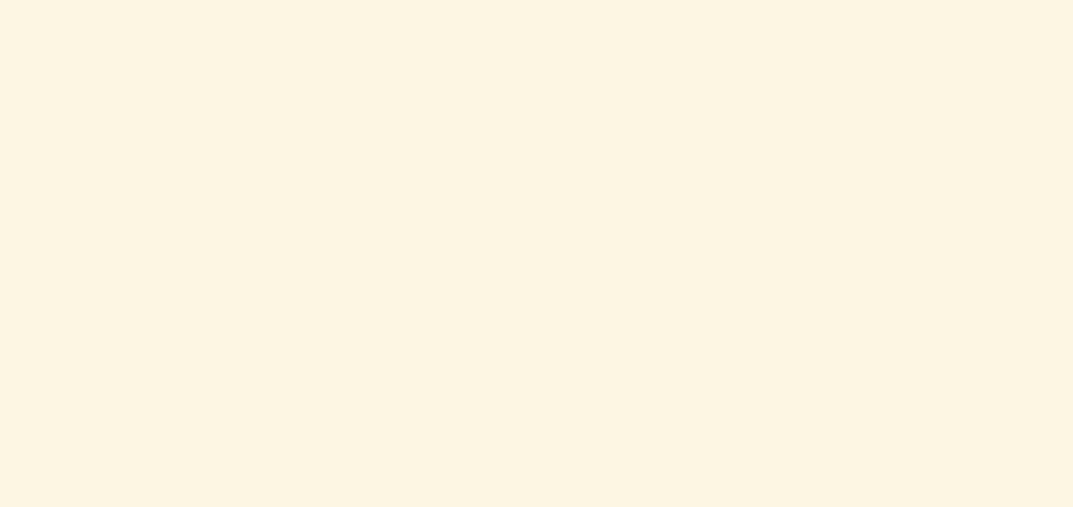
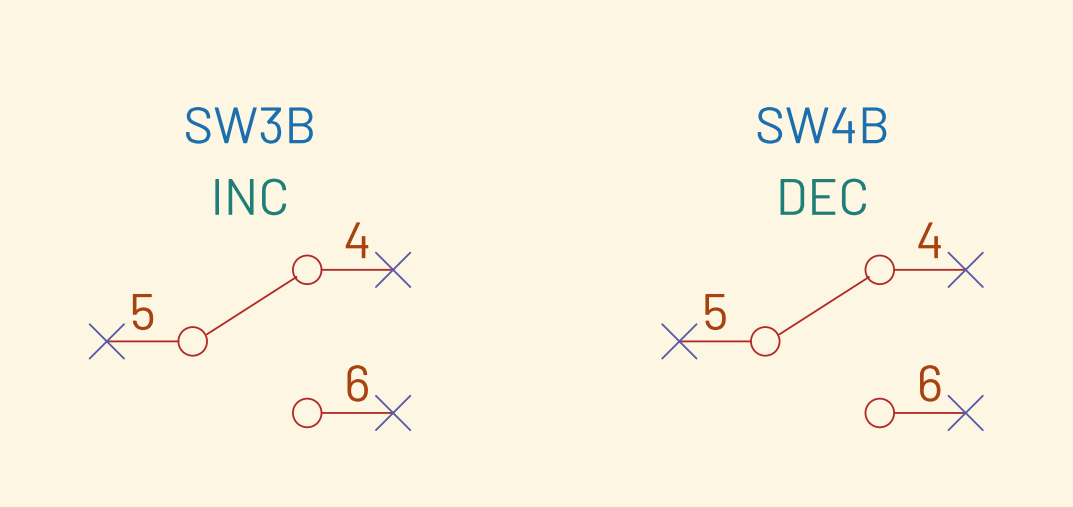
no-connect mark: none -> (393, 269)
no-connect mark: none -> (965, 269)
no-connect mark: none -> (106, 341)
SW3B: none -> INC (249, 341)
no-connect mark: none -> (679, 341)
SW4B: none -> DEC (822, 341)
no-connect mark: none -> (393, 412)
no-connect mark: none -> (965, 412)

